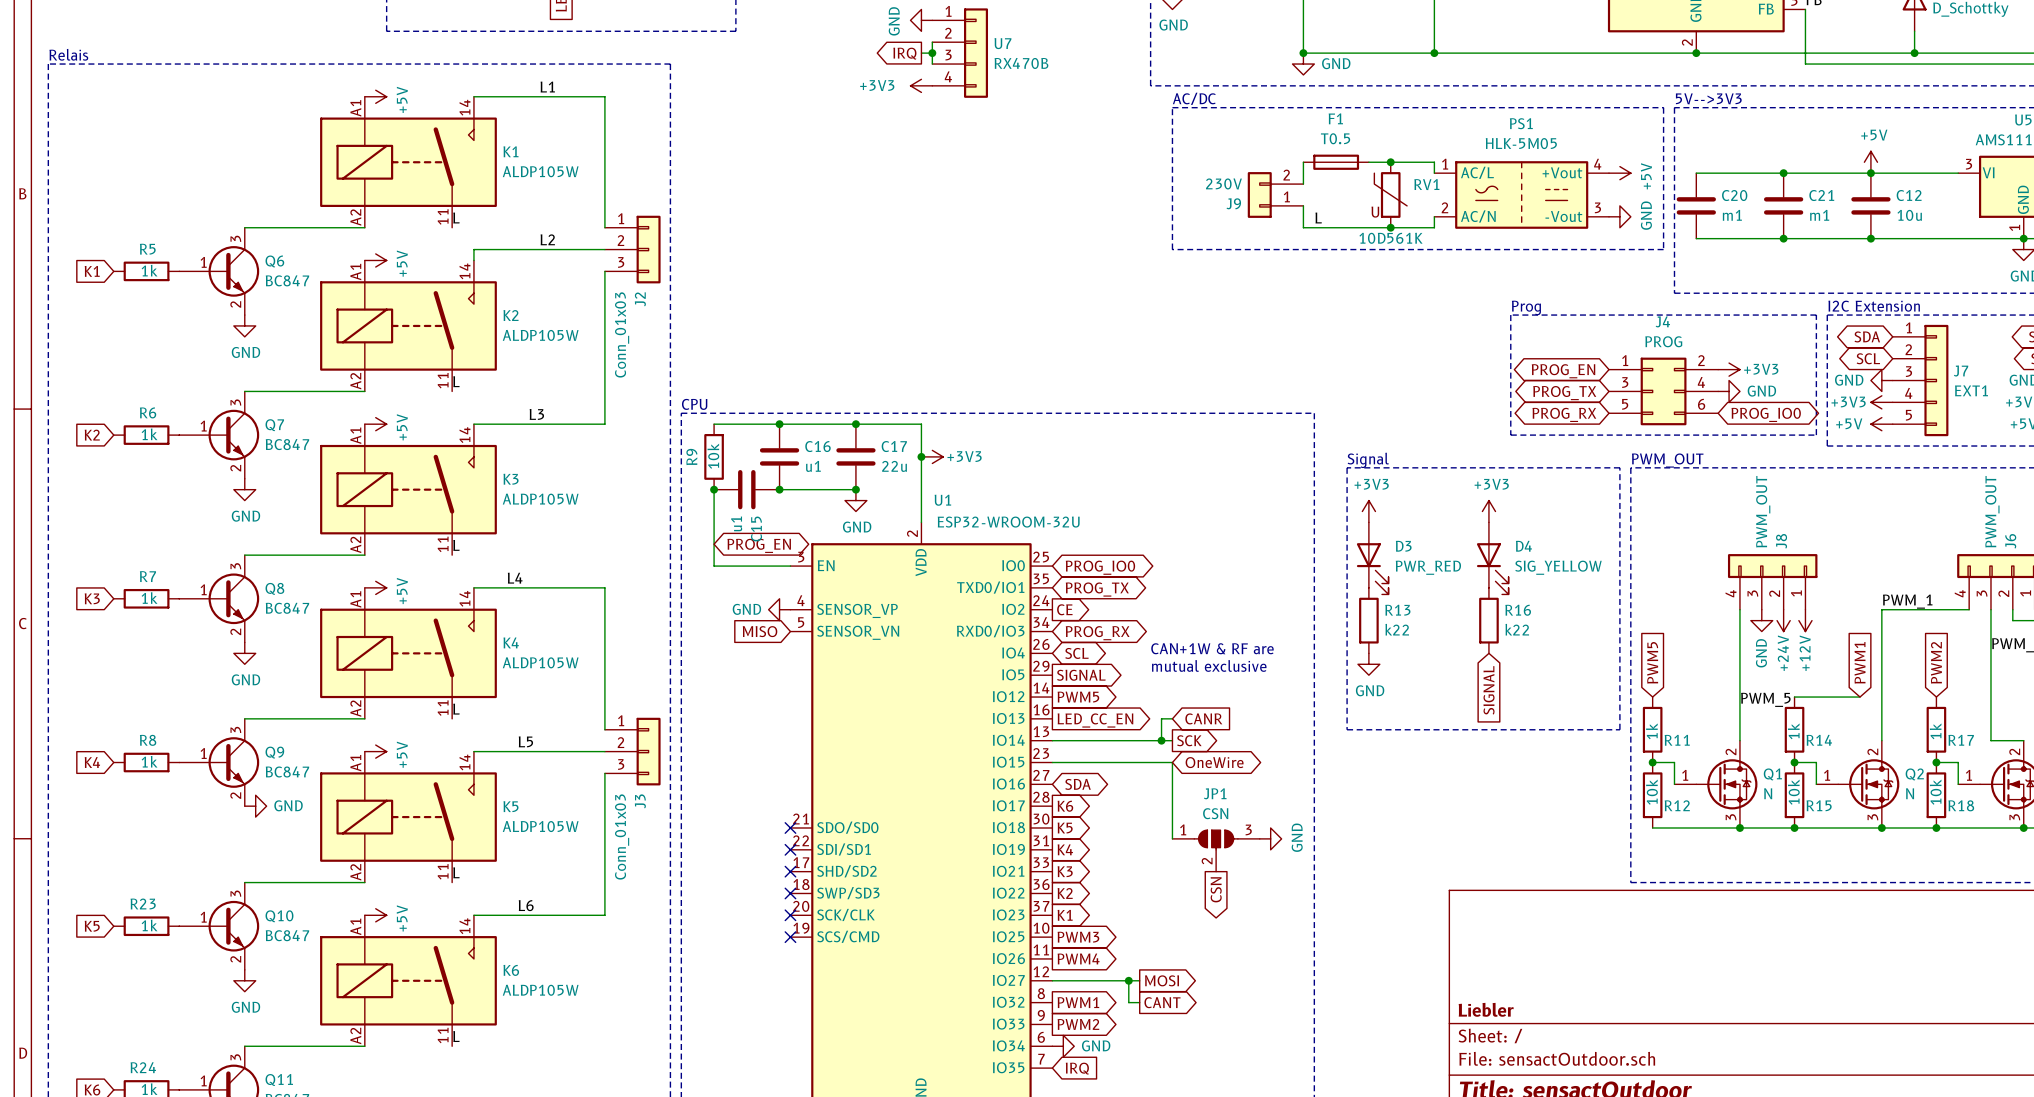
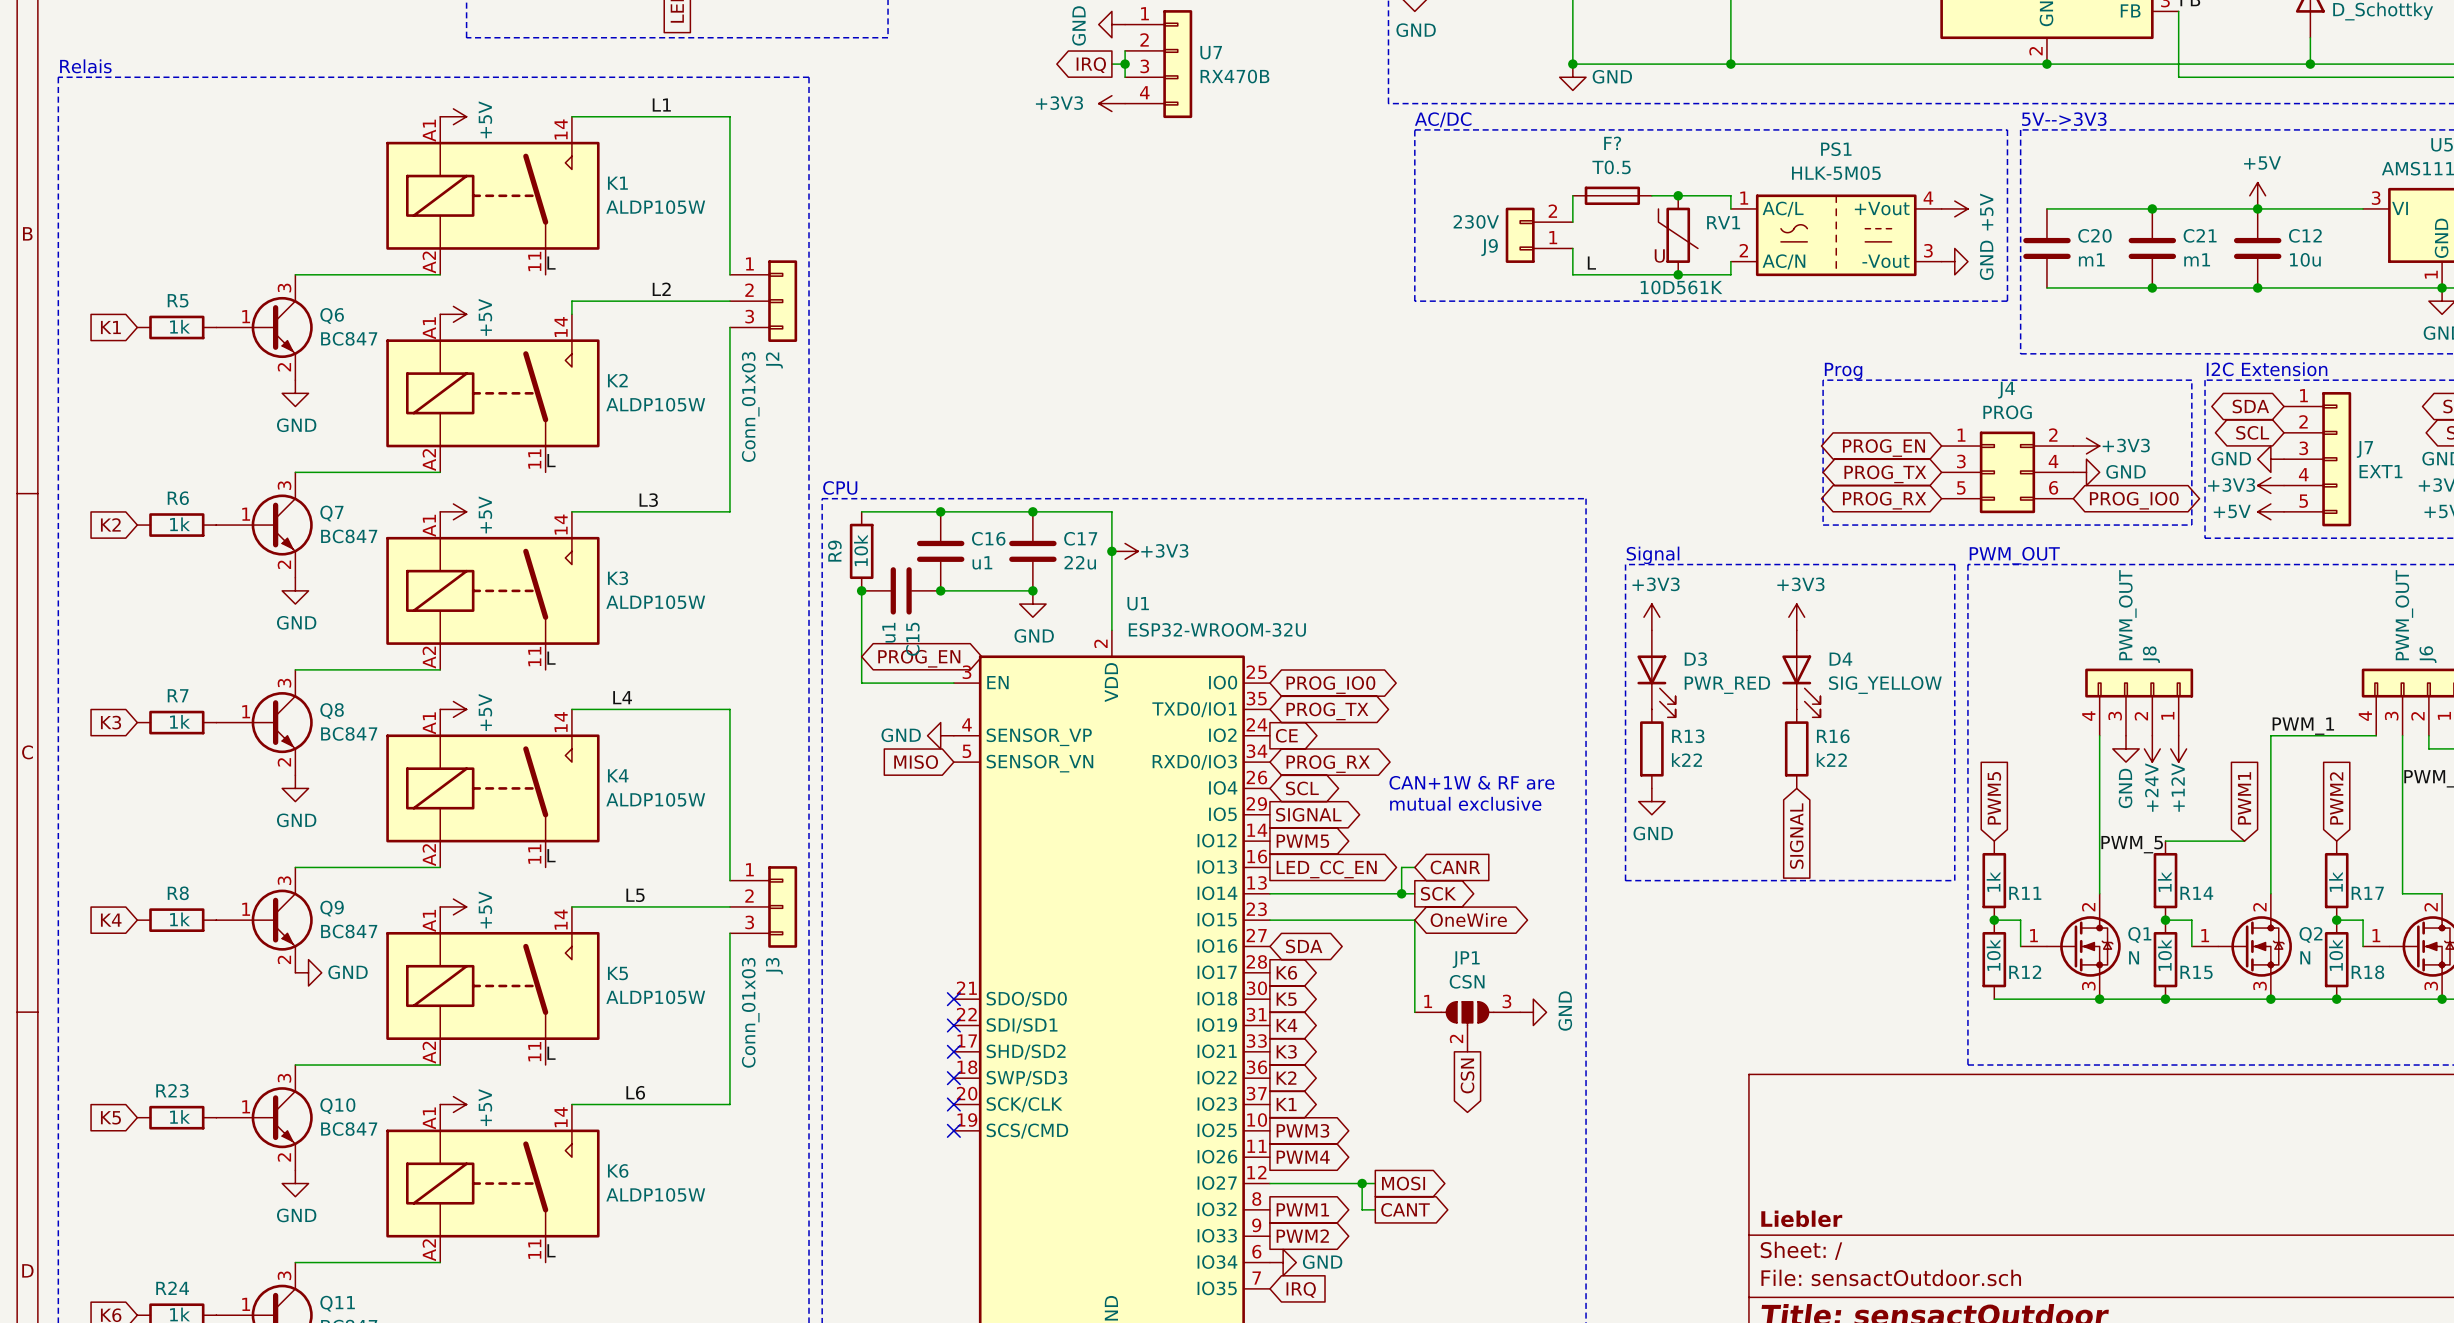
F1 name: F1 (1335, 118) -> F? (1612, 143)

